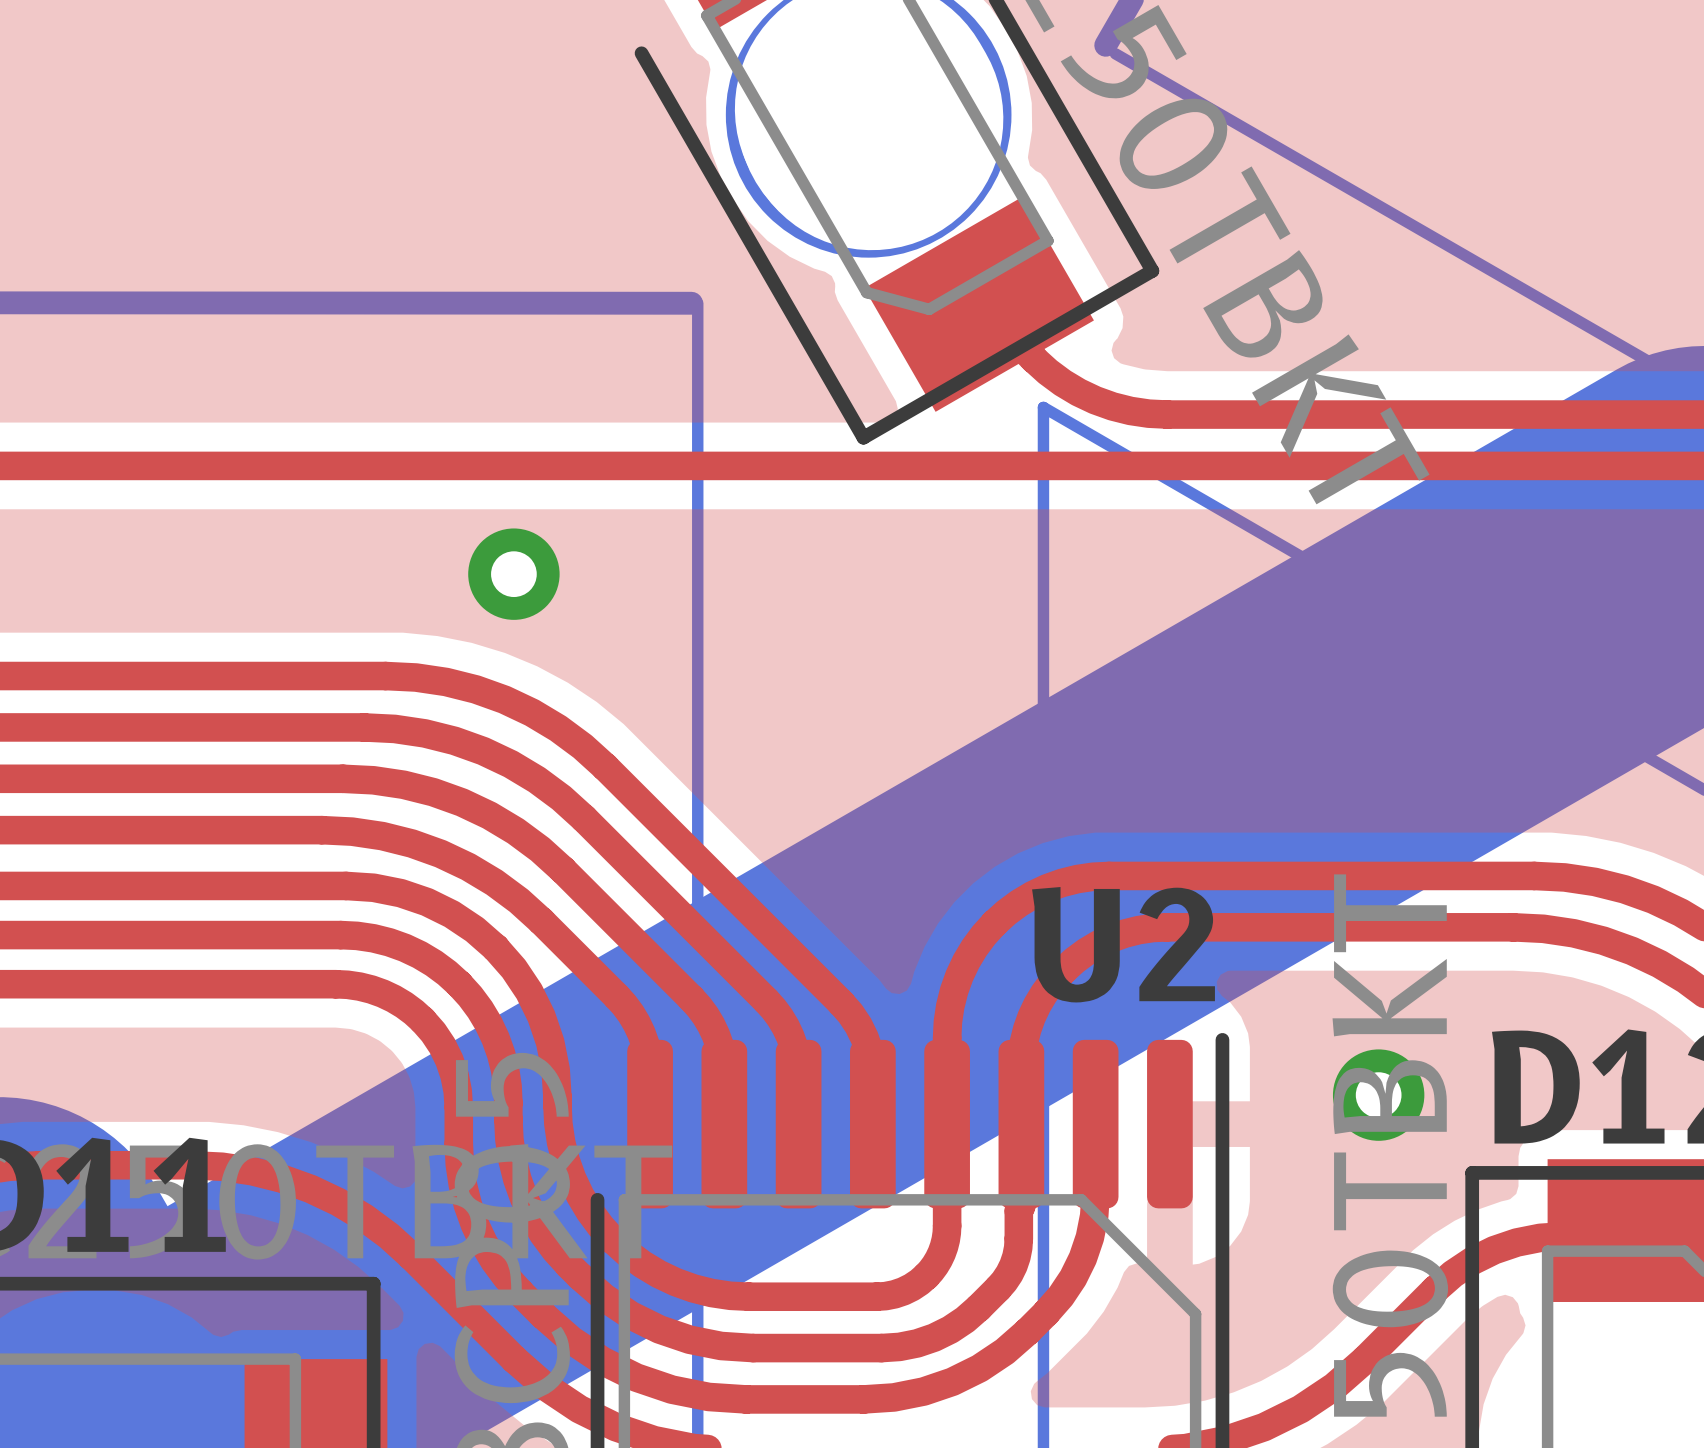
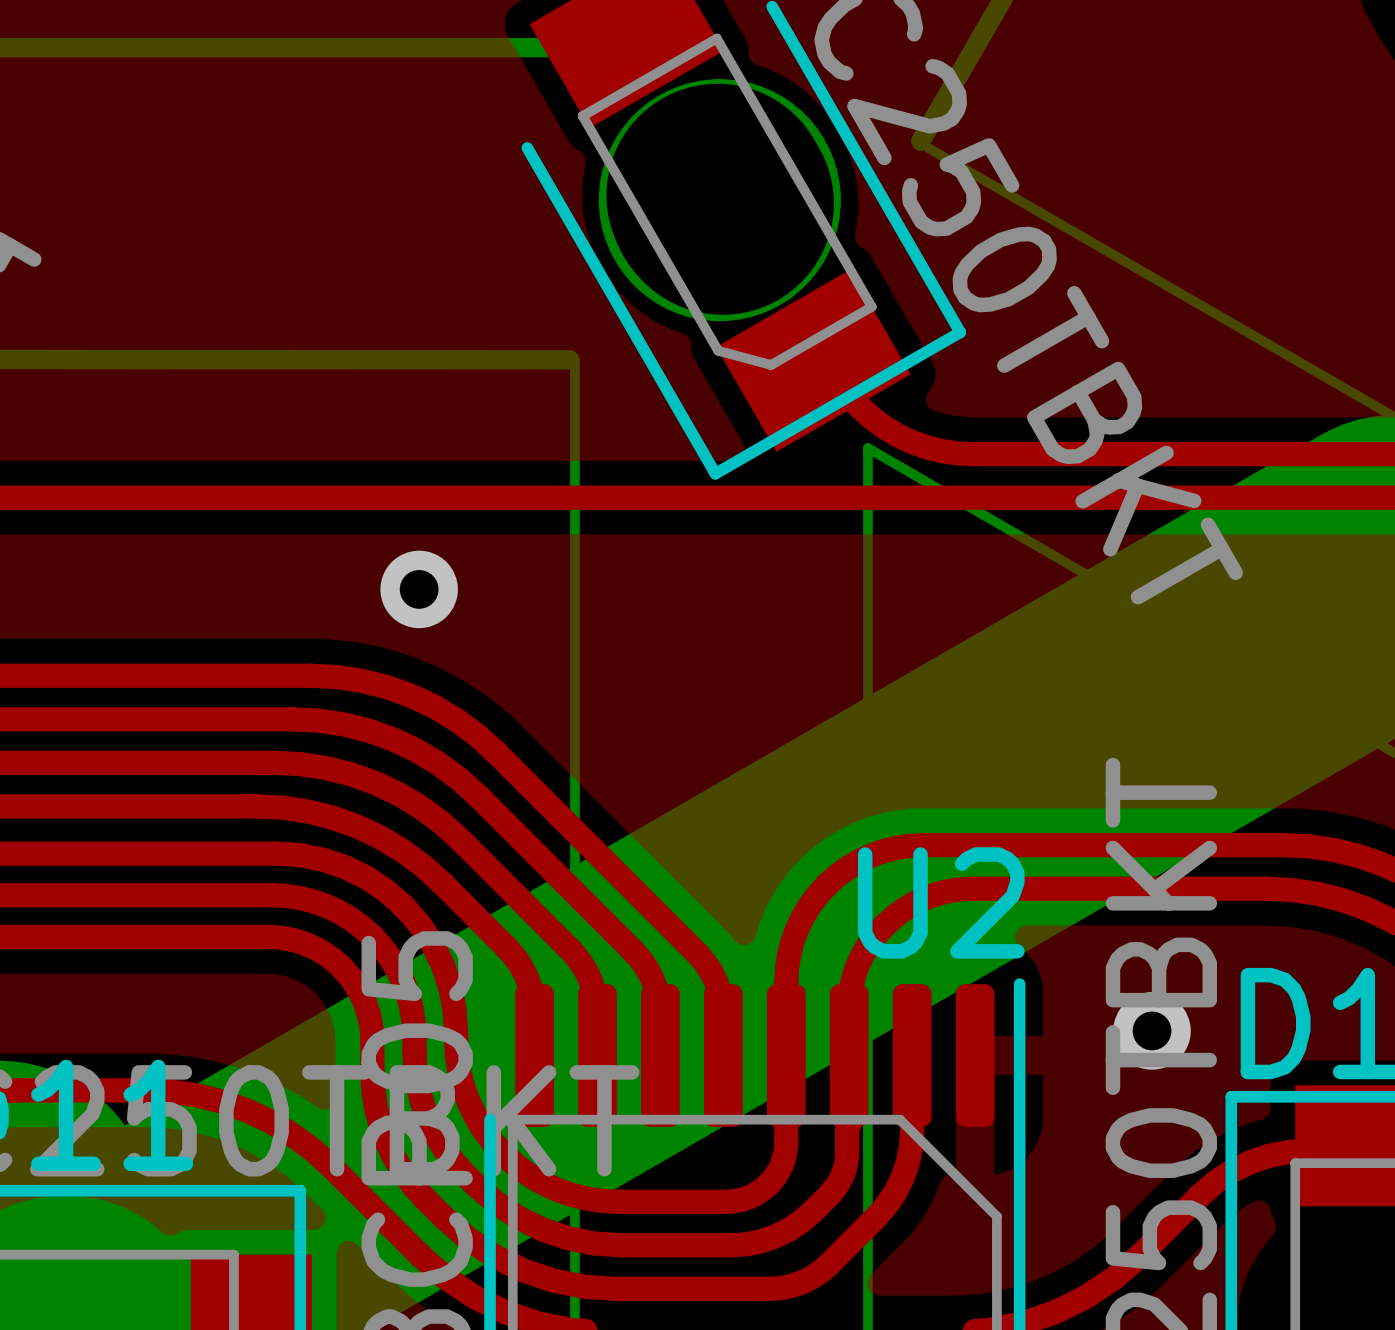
top track: (1095, 1193) (1089, 1237) (1073, 1277) (1060, 1296) (1027, 1331) (1004, 1351) (979, 1368) (952, 1381) (923, 1391) (893, 1397) (863, 1399) -> (912, 1114) (911, 1146) (907, 1162) (895, 1191) (876, 1217) (823, 1269) (809, 1278) (785, 1287) (715, 1288)

